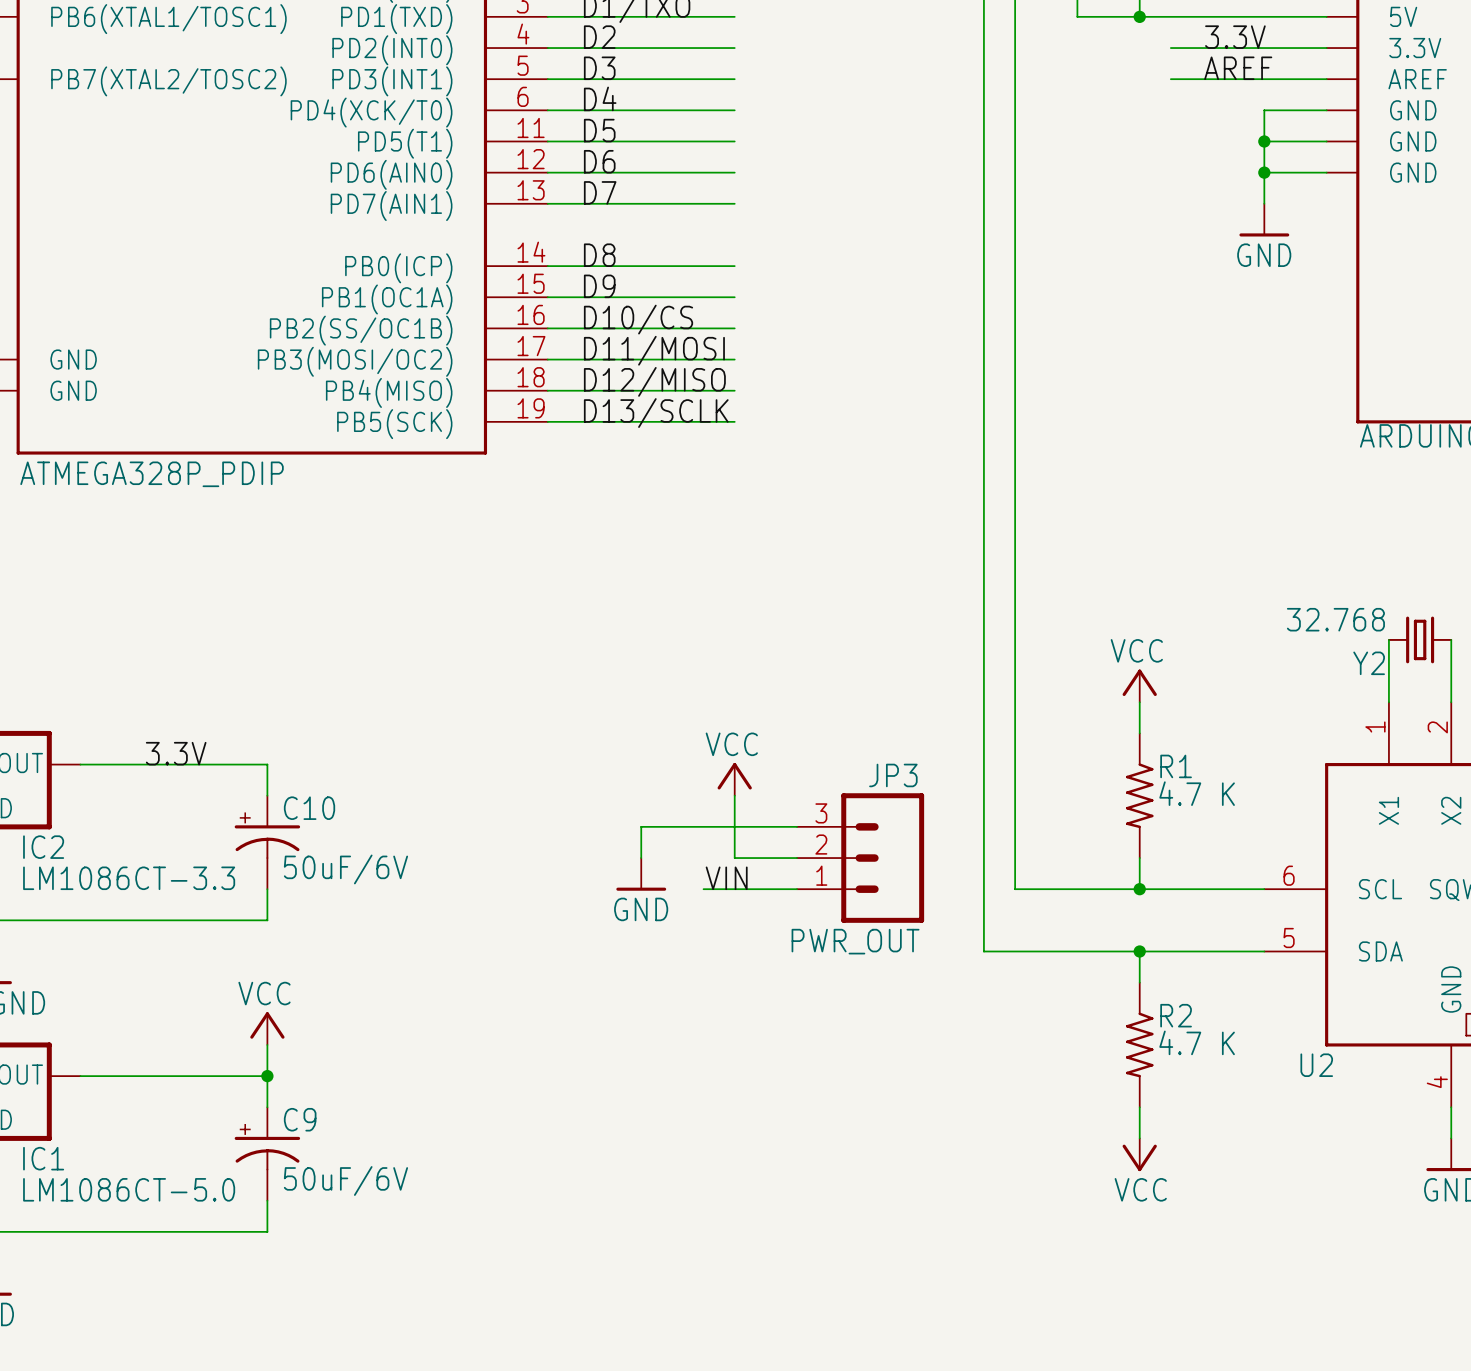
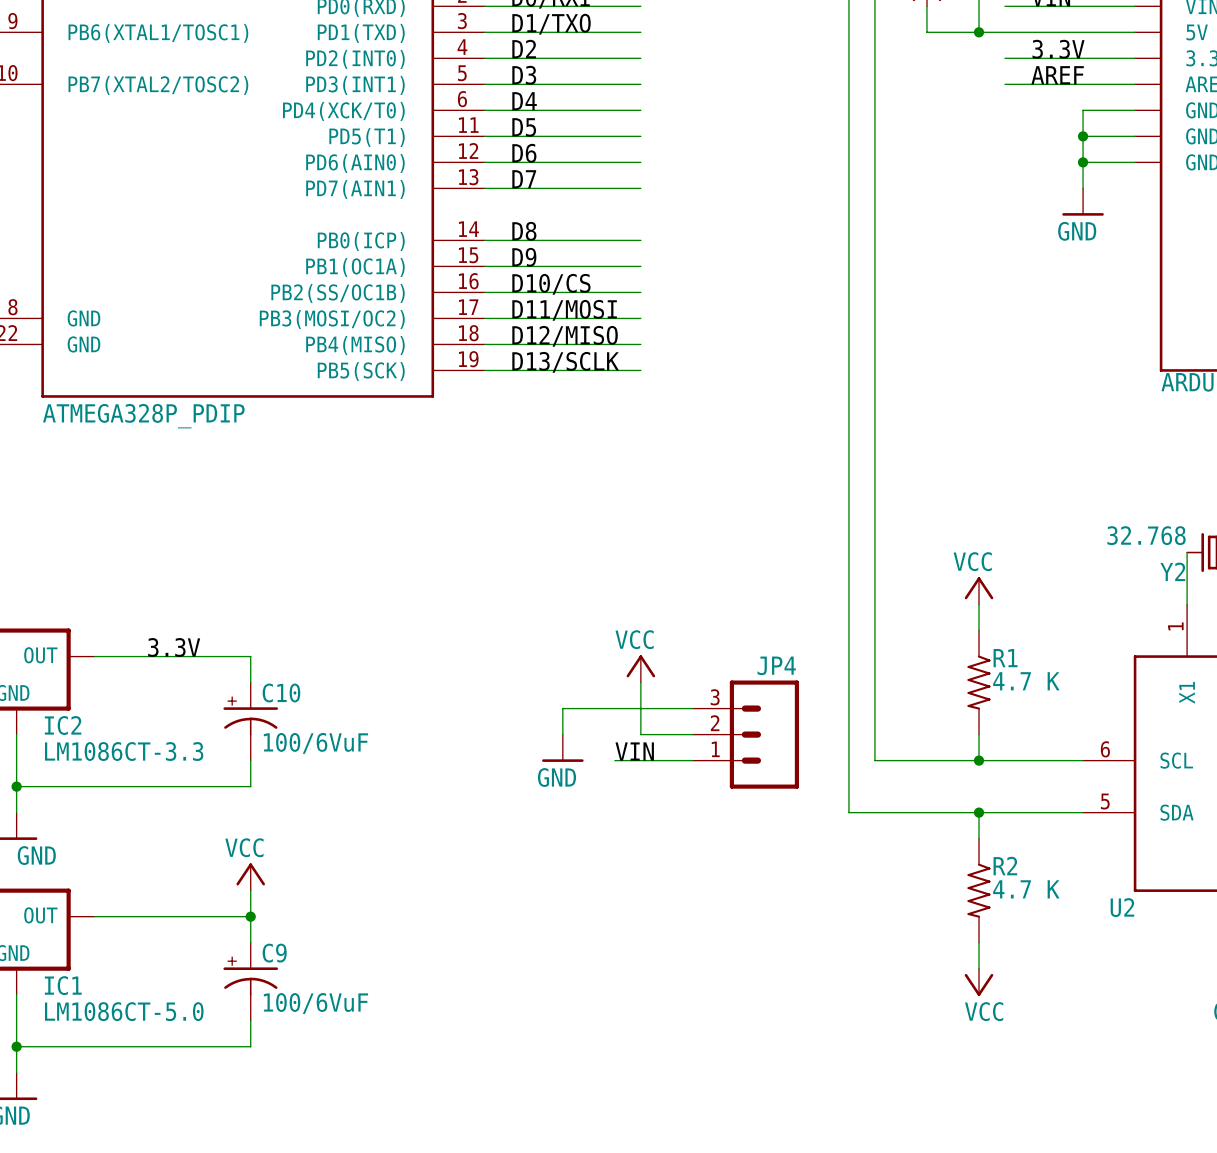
JP3 name: JP3 (893, 775) -> JP4 (776, 665)
C10 value: 50uF/6V (345, 869) -> 100/6VuF (315, 743)
JP3 value: PWR_OUT (855, 941) -> none
C9 value: 50uF/6V (345, 1181) -> 100/6VuF (315, 1003)

